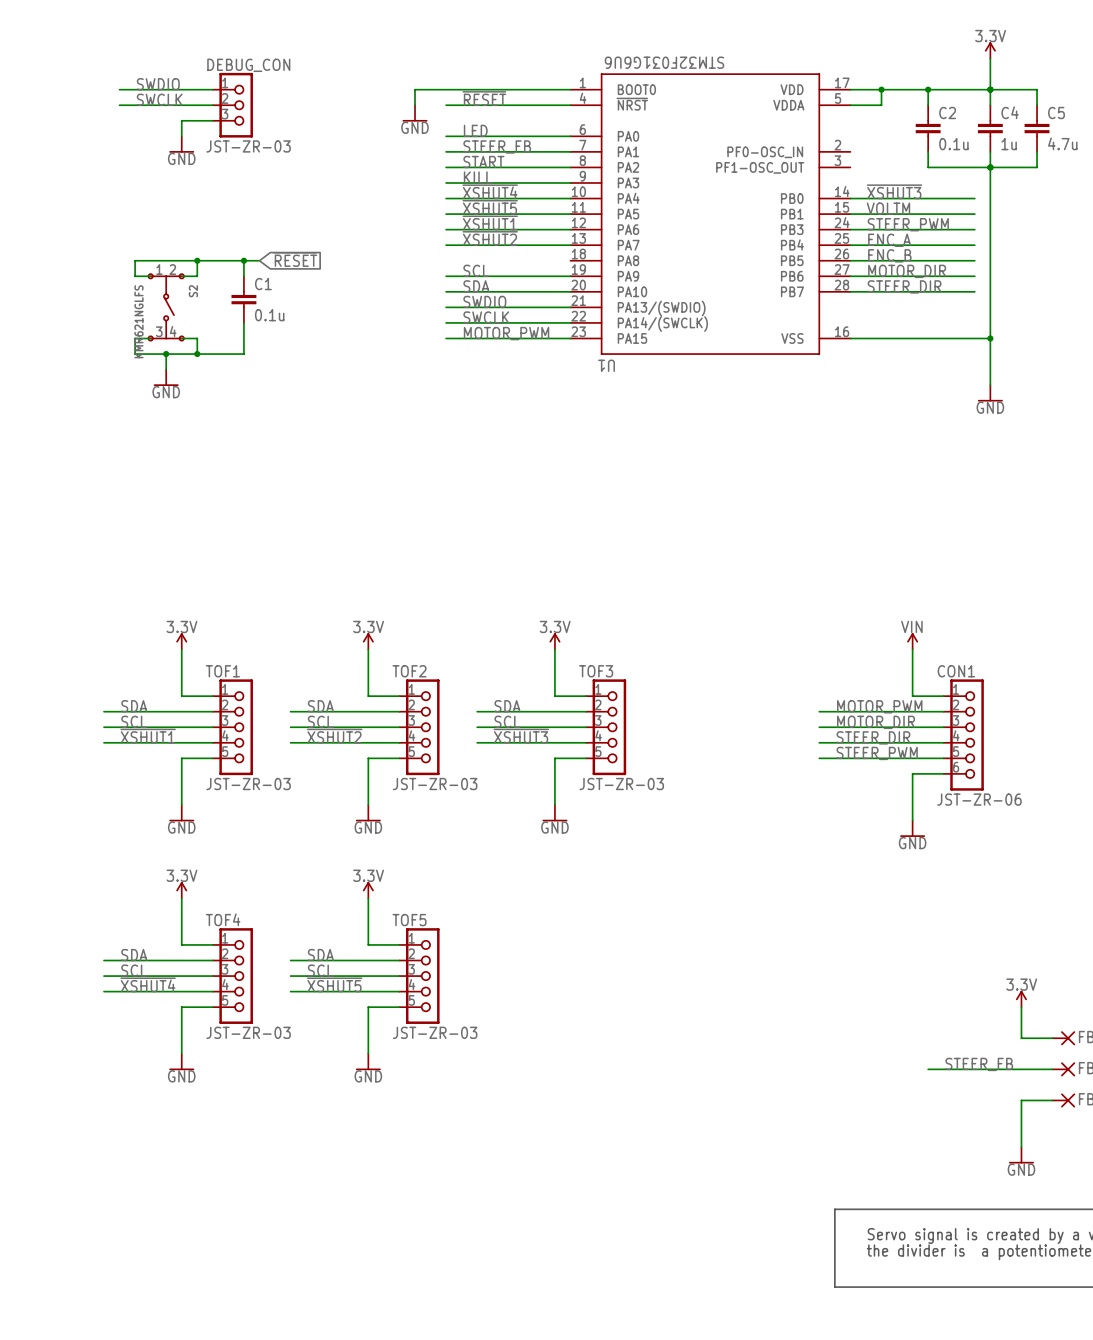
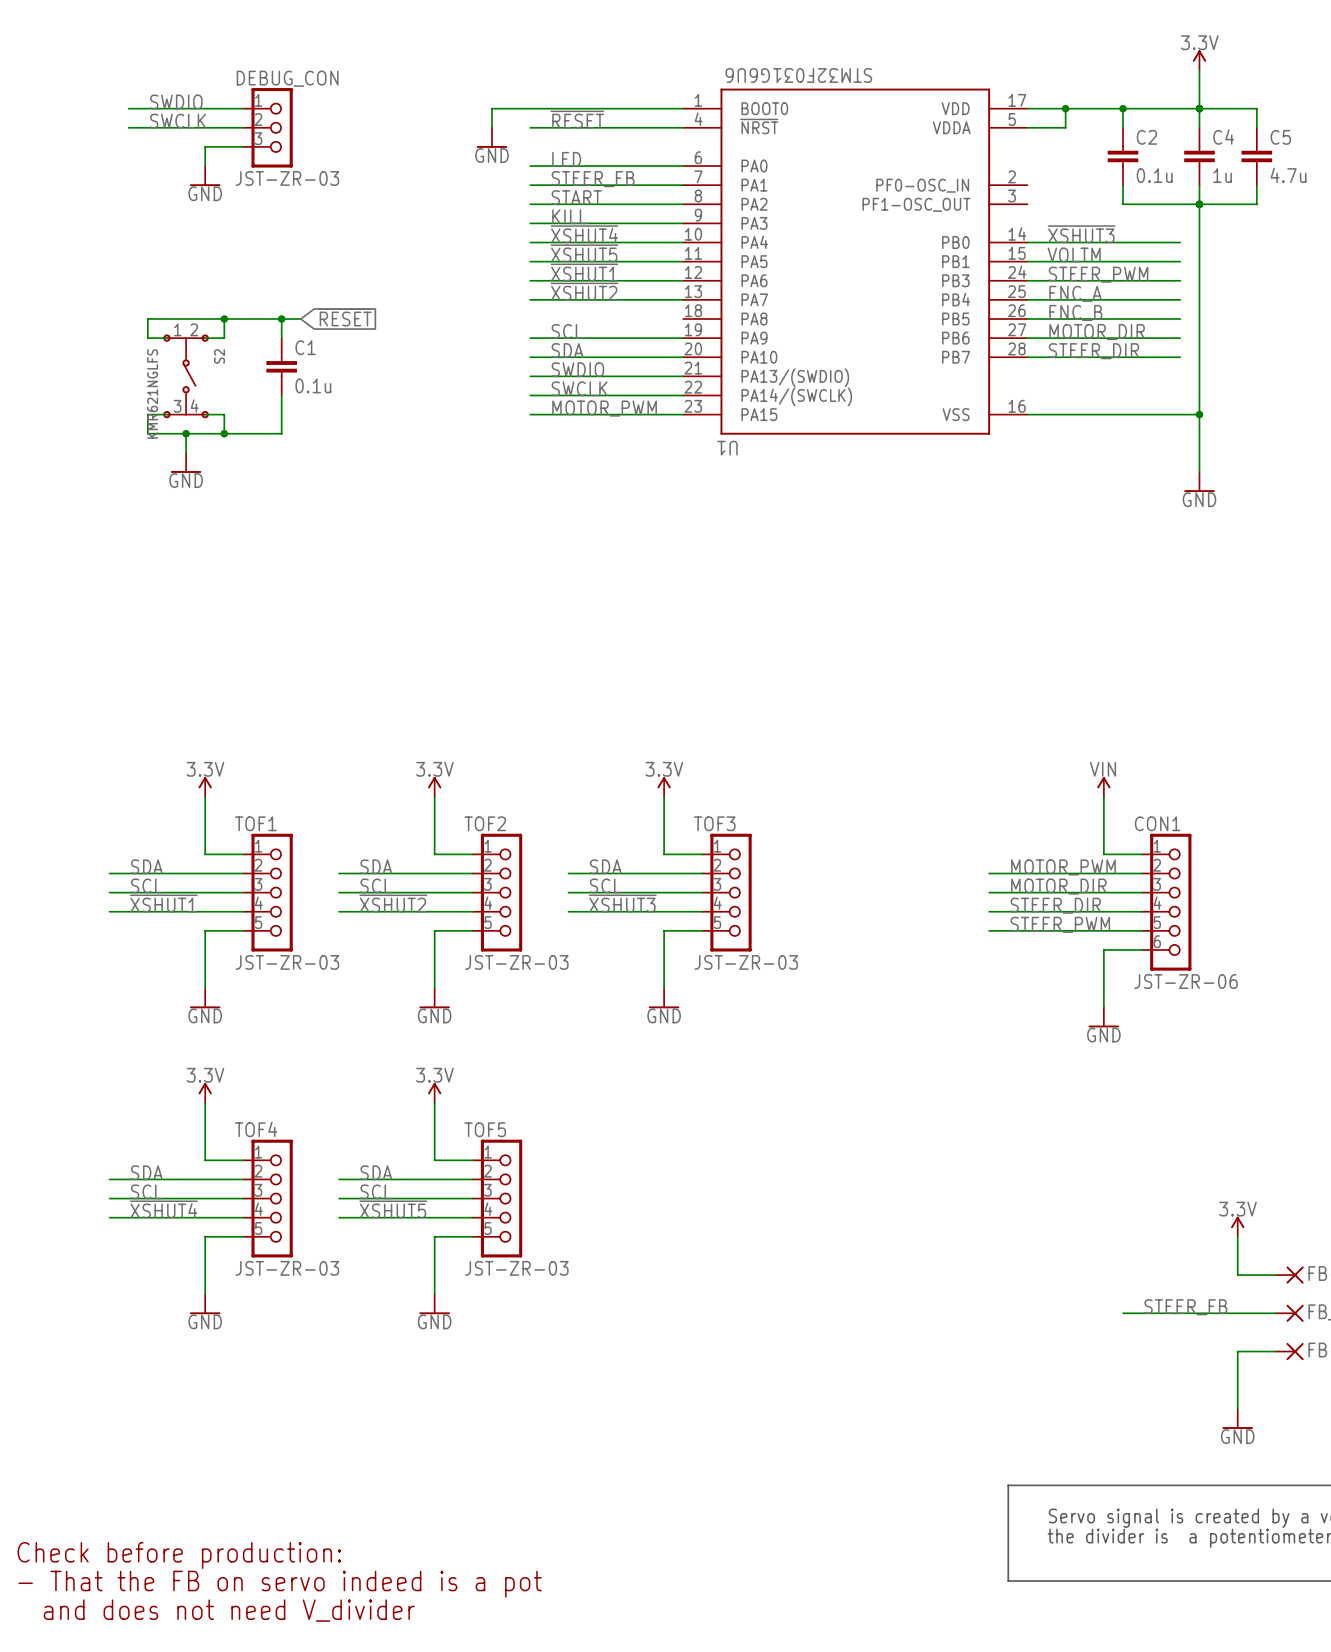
text: none -> Check before production: (179, 1555)
text: none -> - That the FB on servo indeed is a pot (280, 1584)
text: none -> and does not need V_divider (229, 1610)

